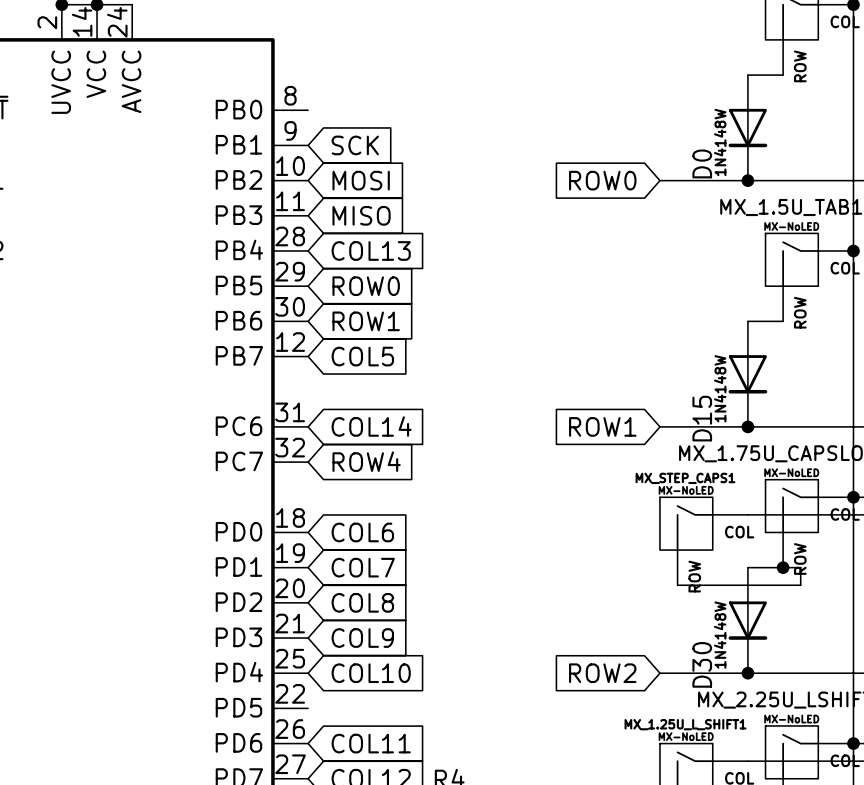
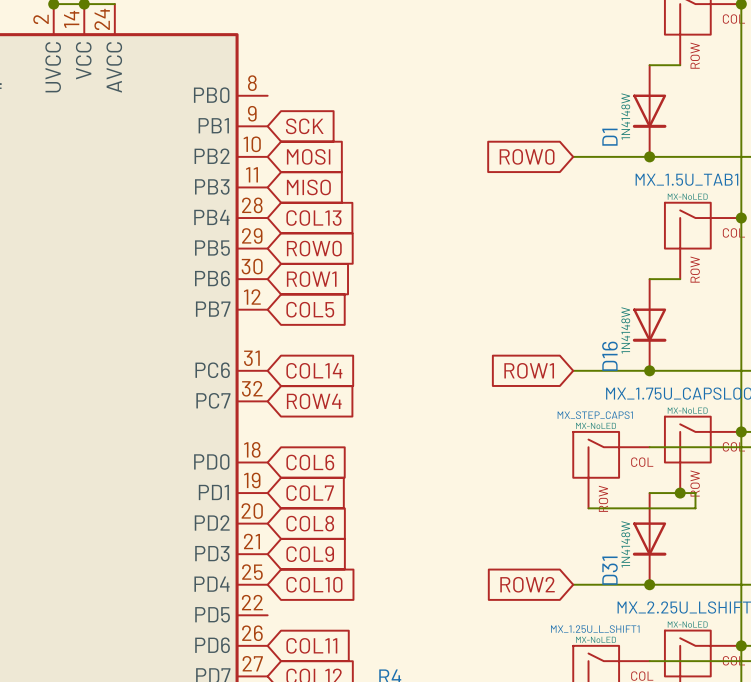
D0 name: D0 (702, 163) -> D1 (609, 137)
D15 name: D15 (702, 418) -> D16 (609, 356)
D30 name: D30 (702, 664) -> D31 (610, 570)

